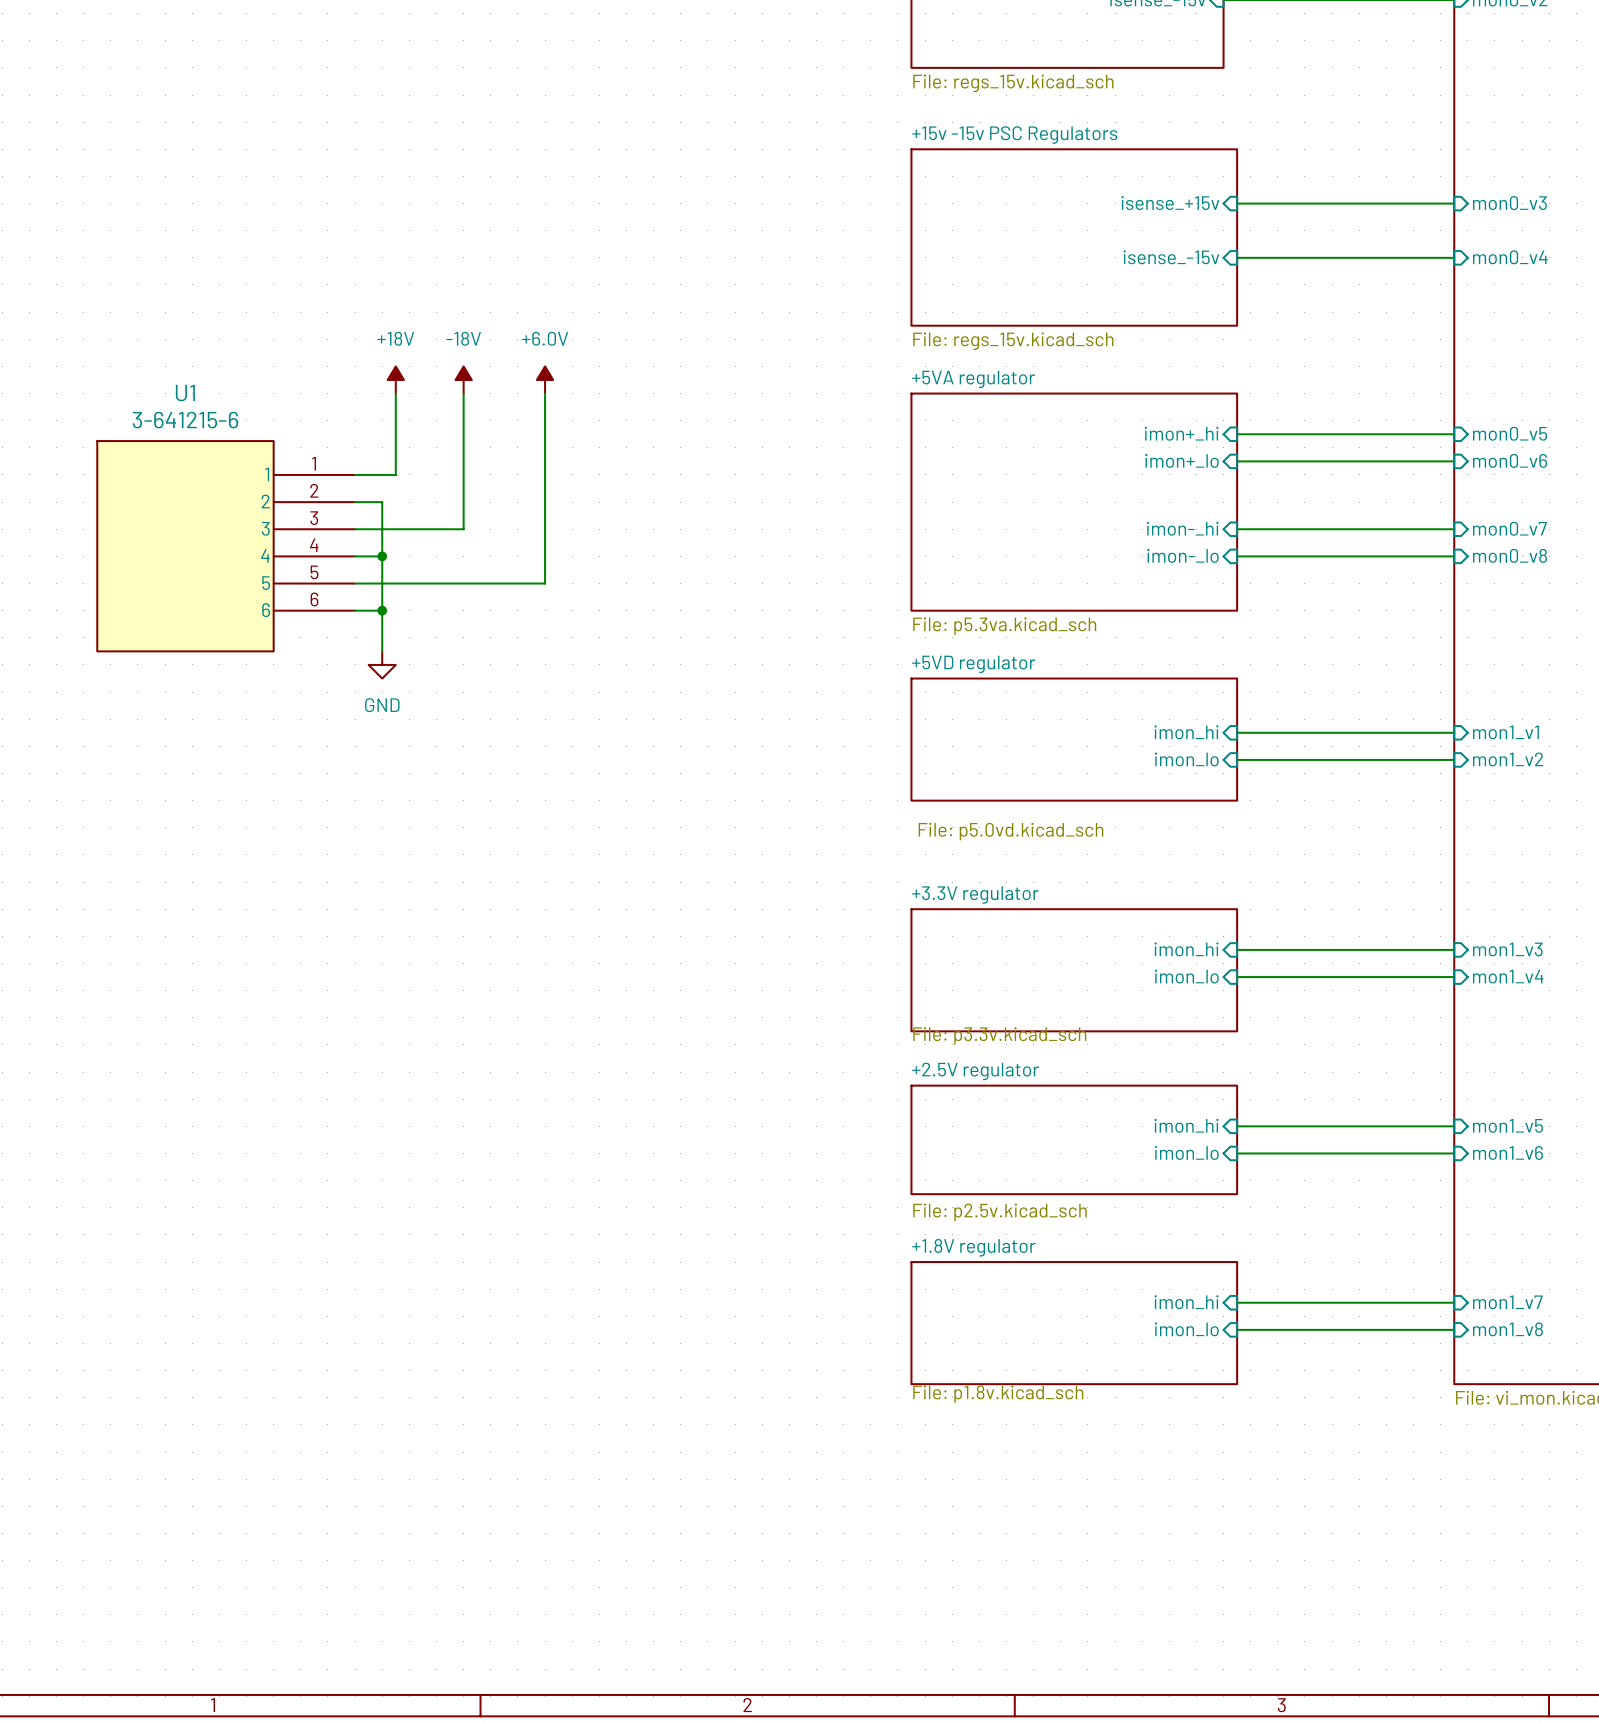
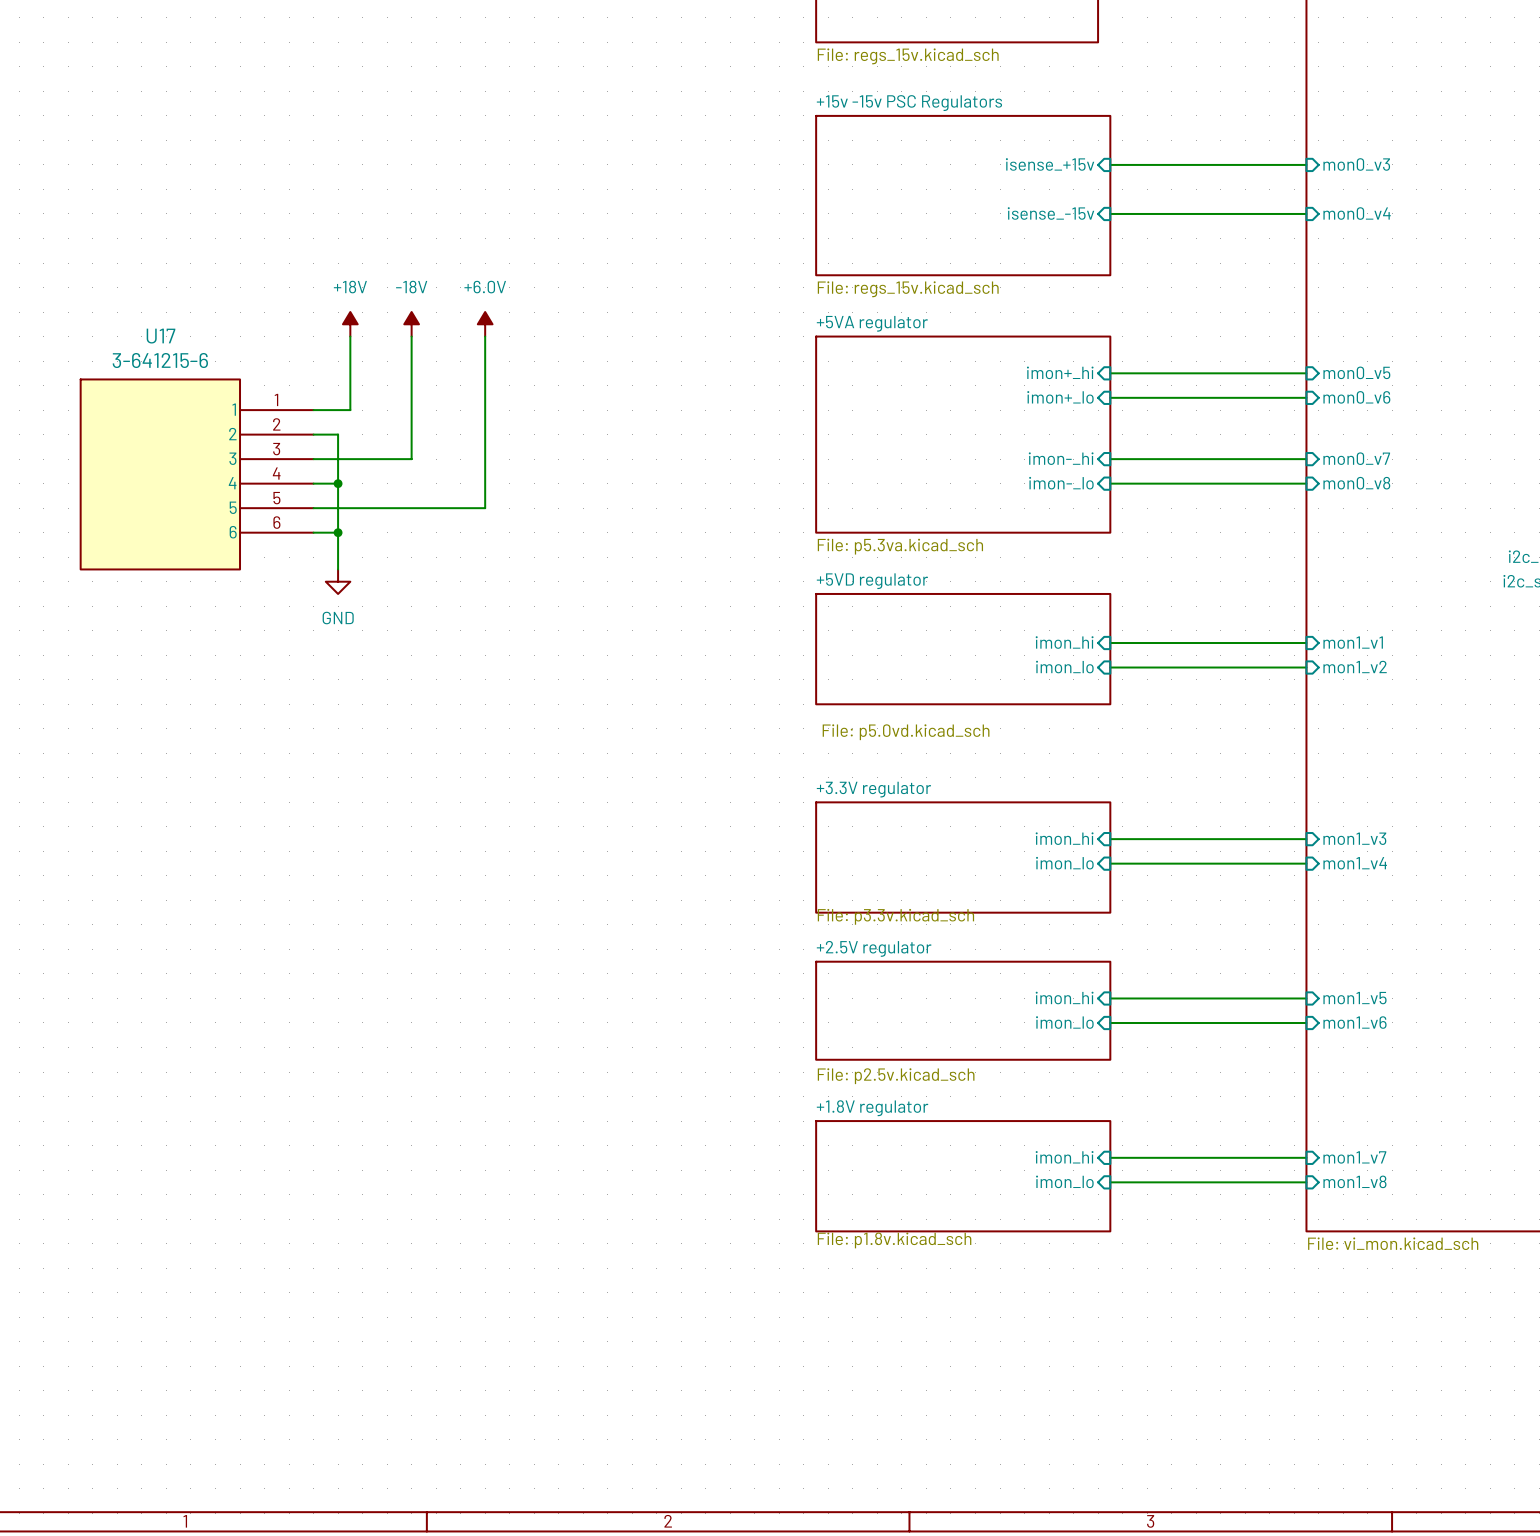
U1 name: U1 (185, 393) -> U17 (161, 336)

